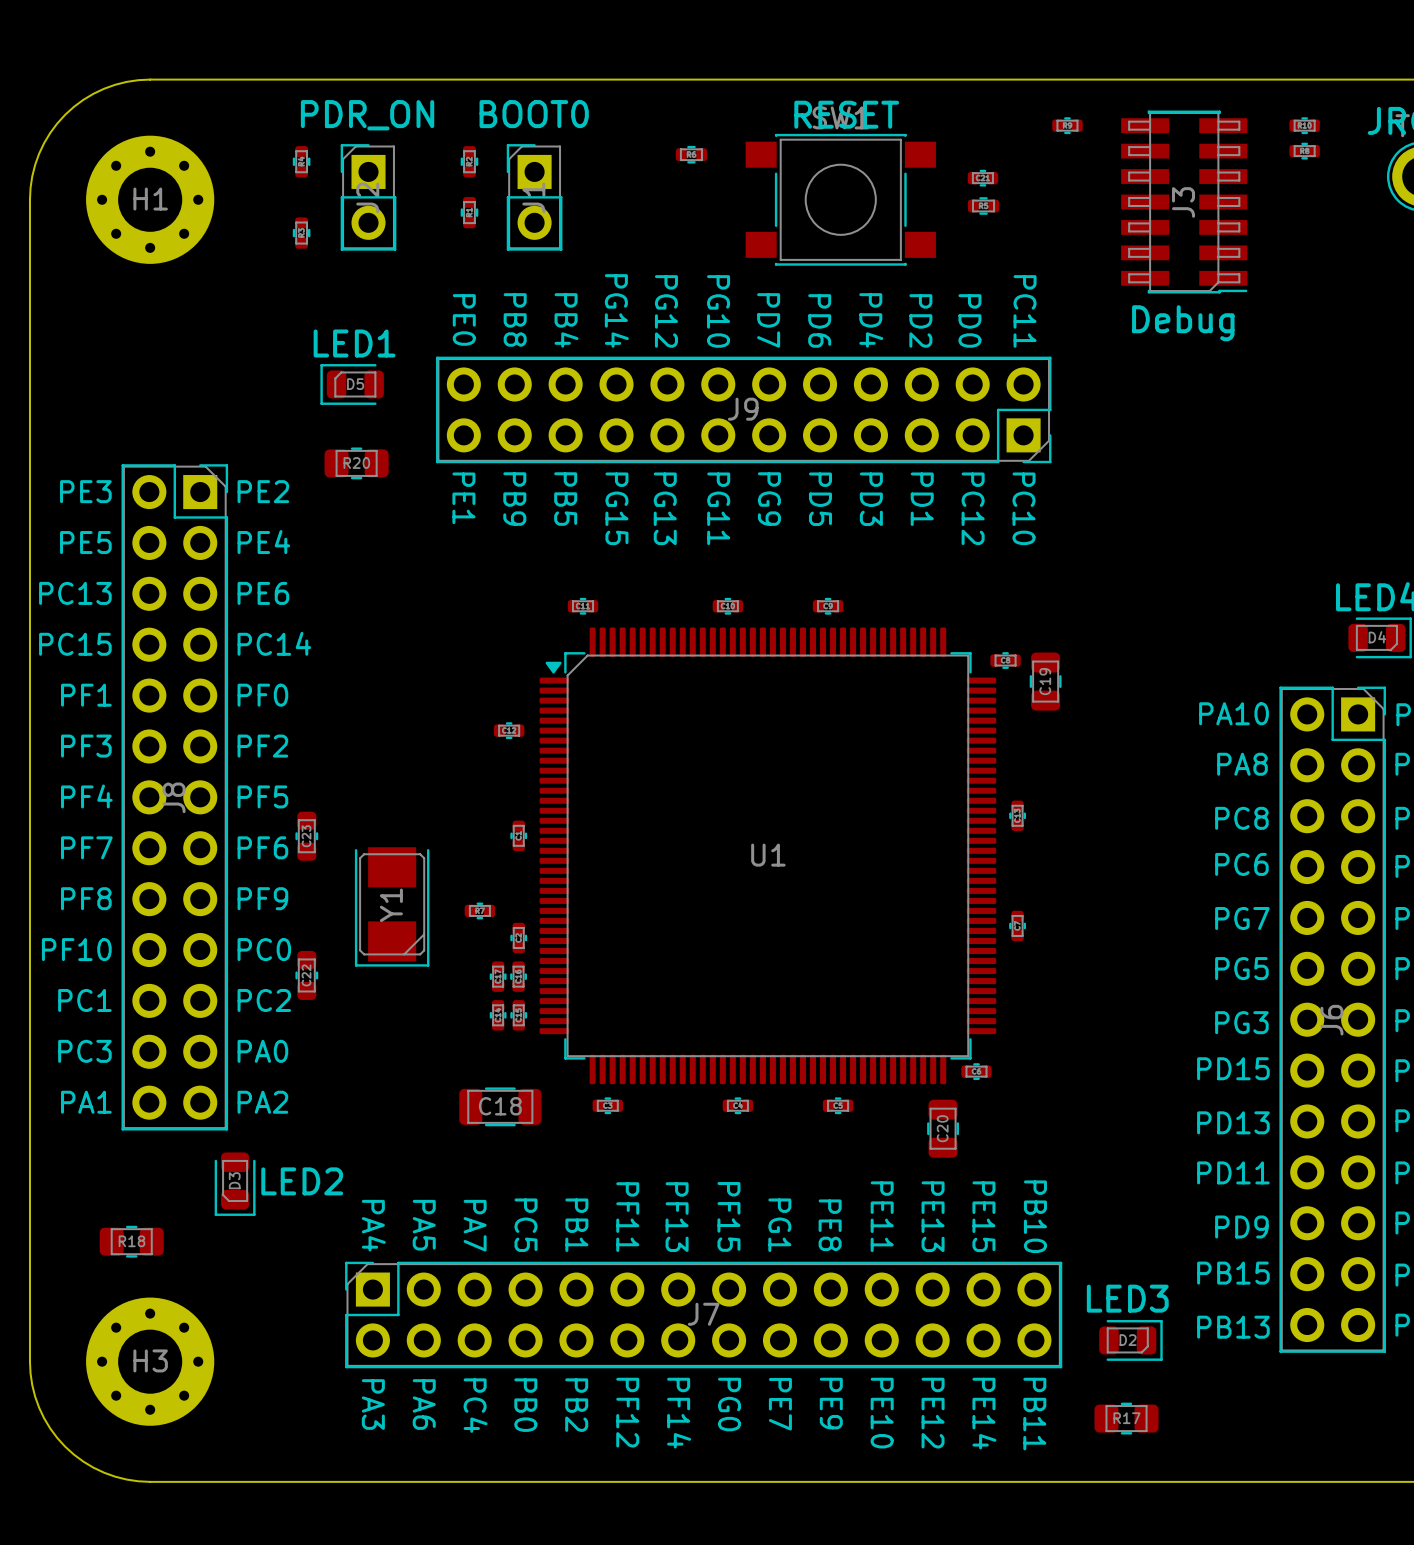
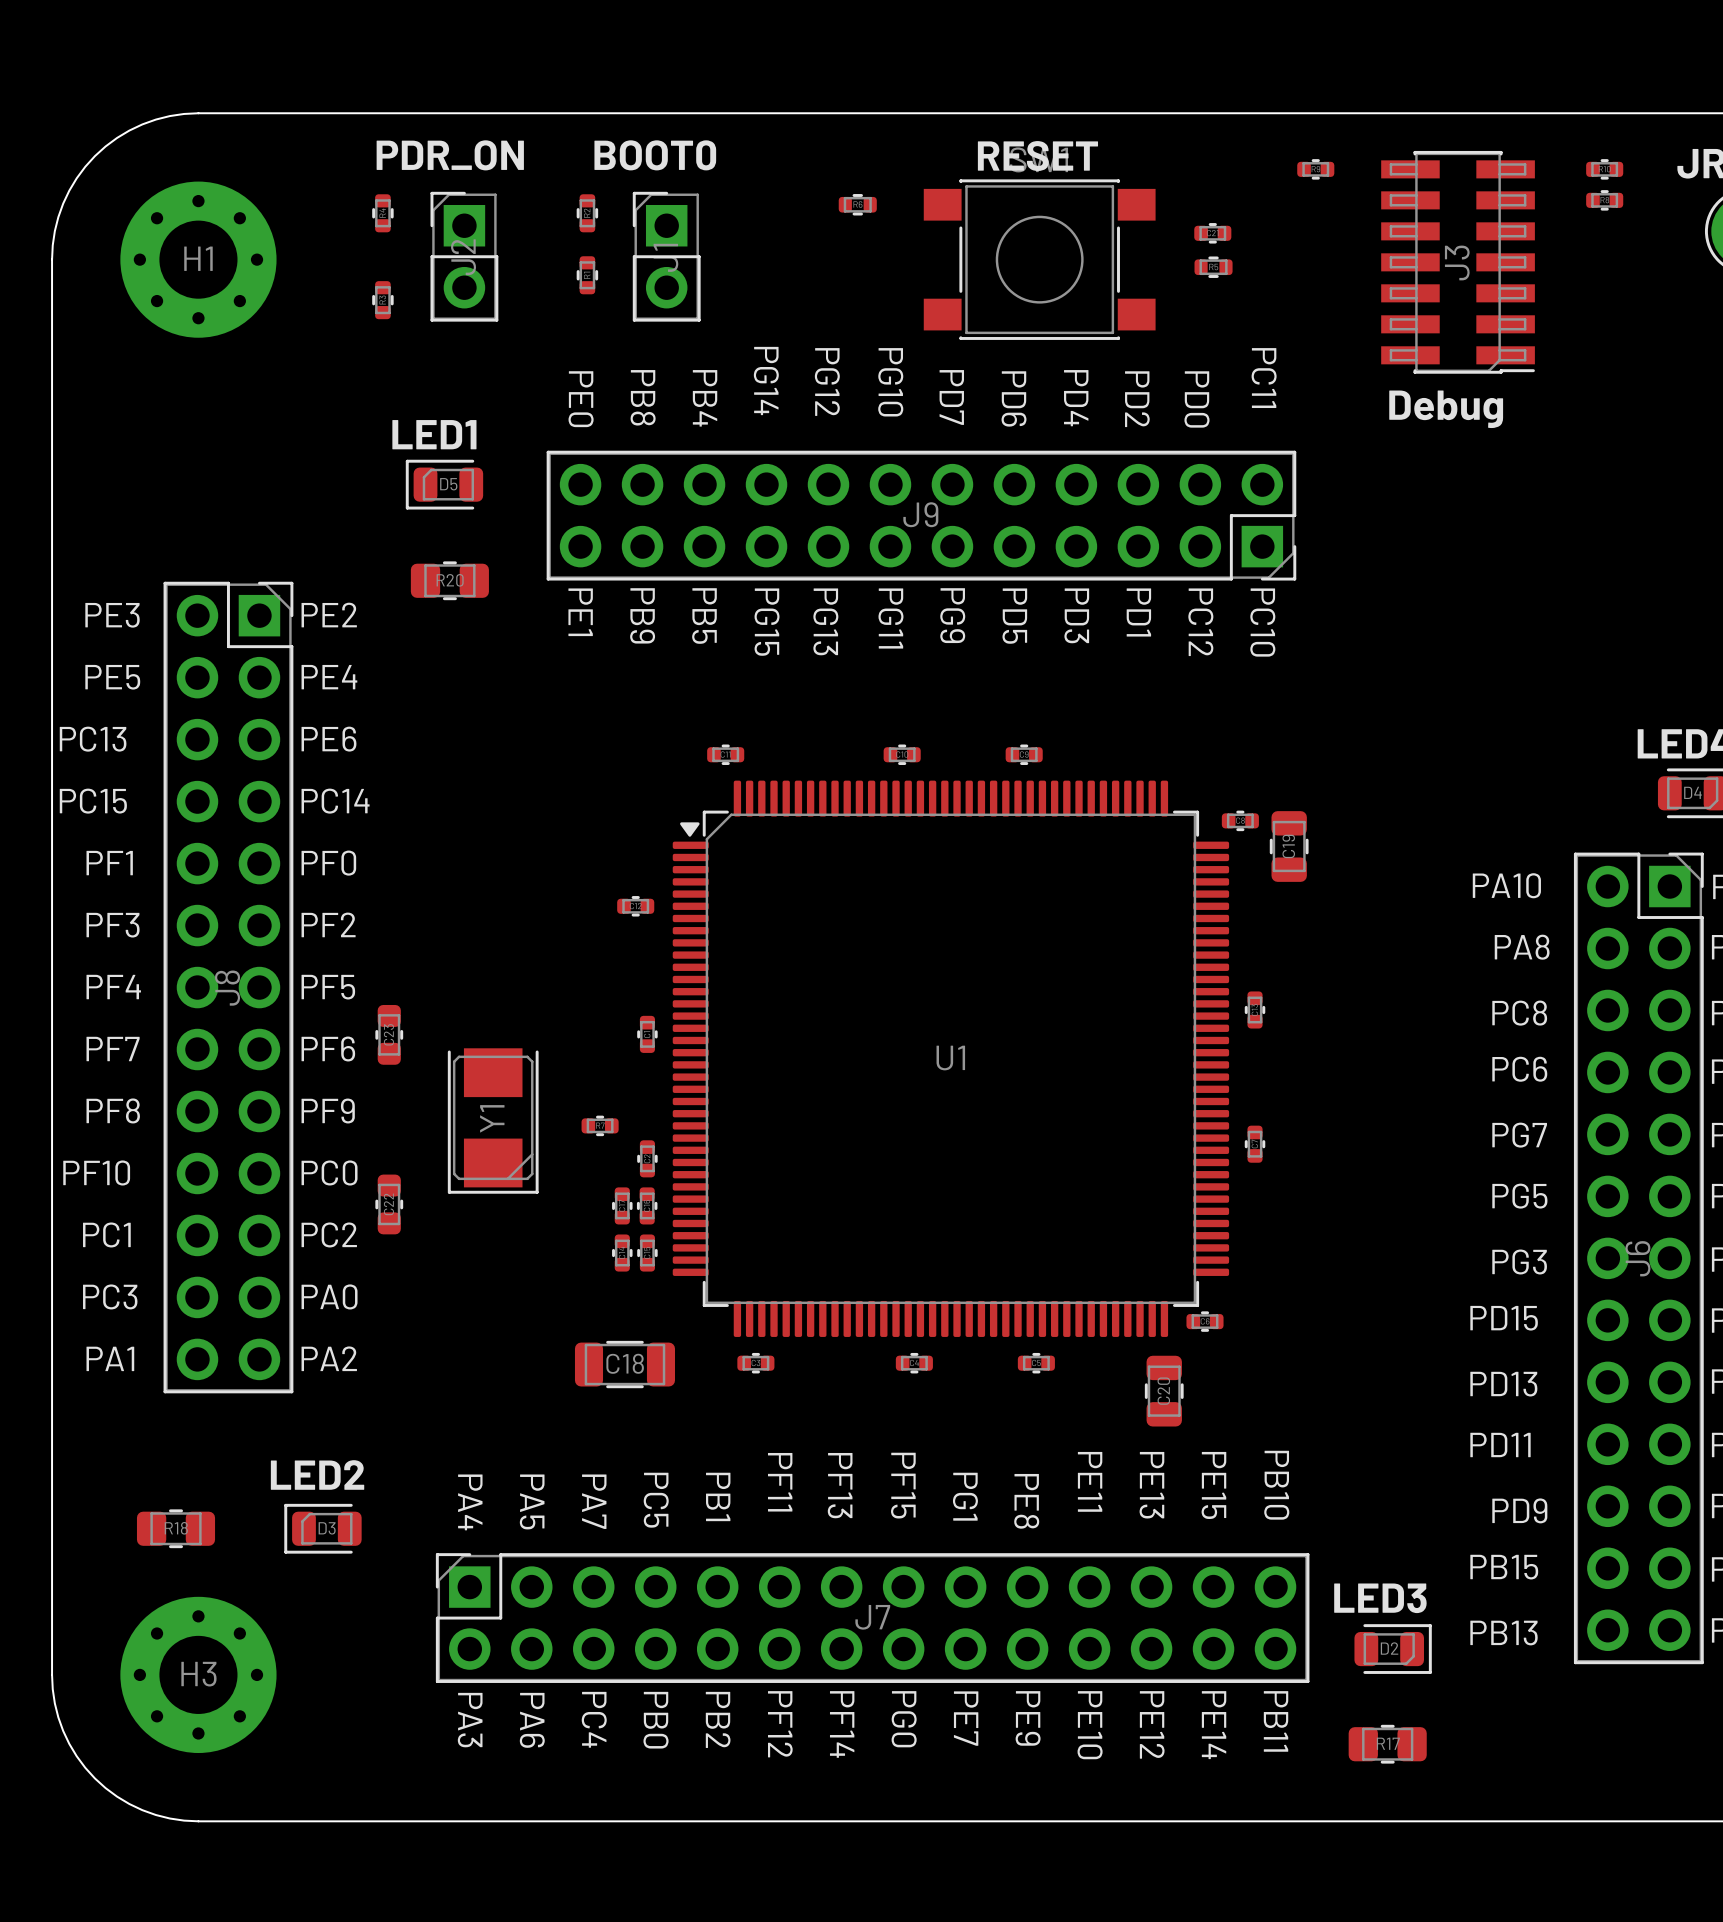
text position: LED2 (302, 1181) -> LED2 (317, 1474)
D3 rotation: 0° (235, 1184) -> 90° clockwise (322, 1528)
D3 position: (235, 1184) -> (322, 1528)

